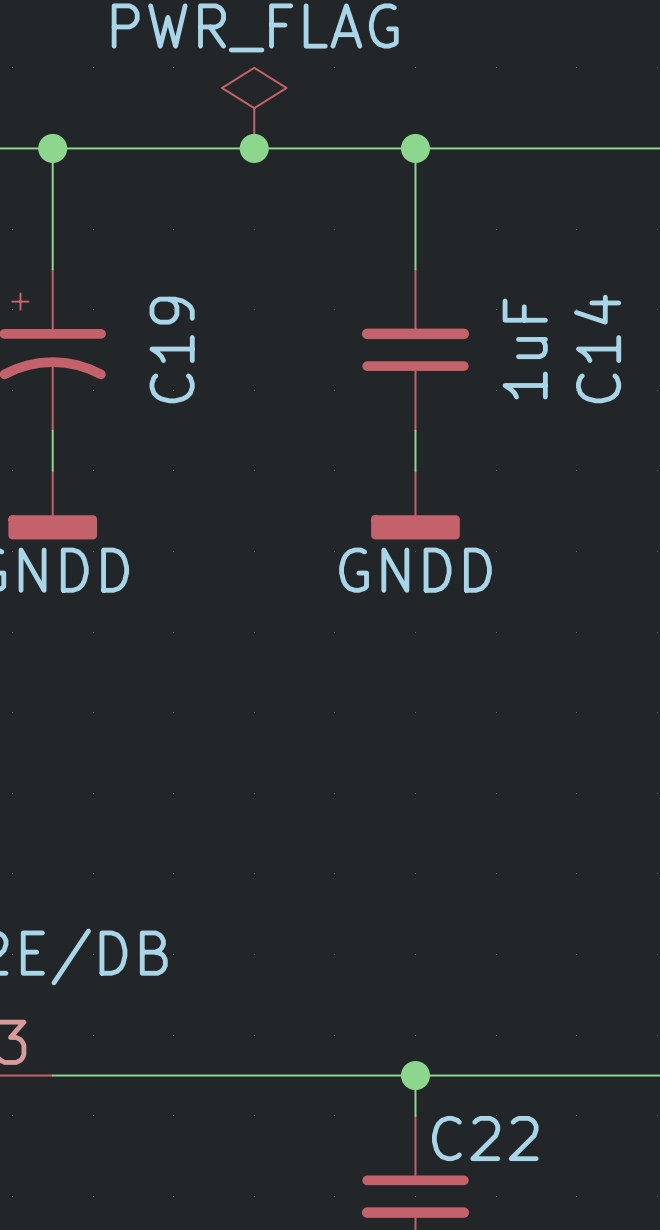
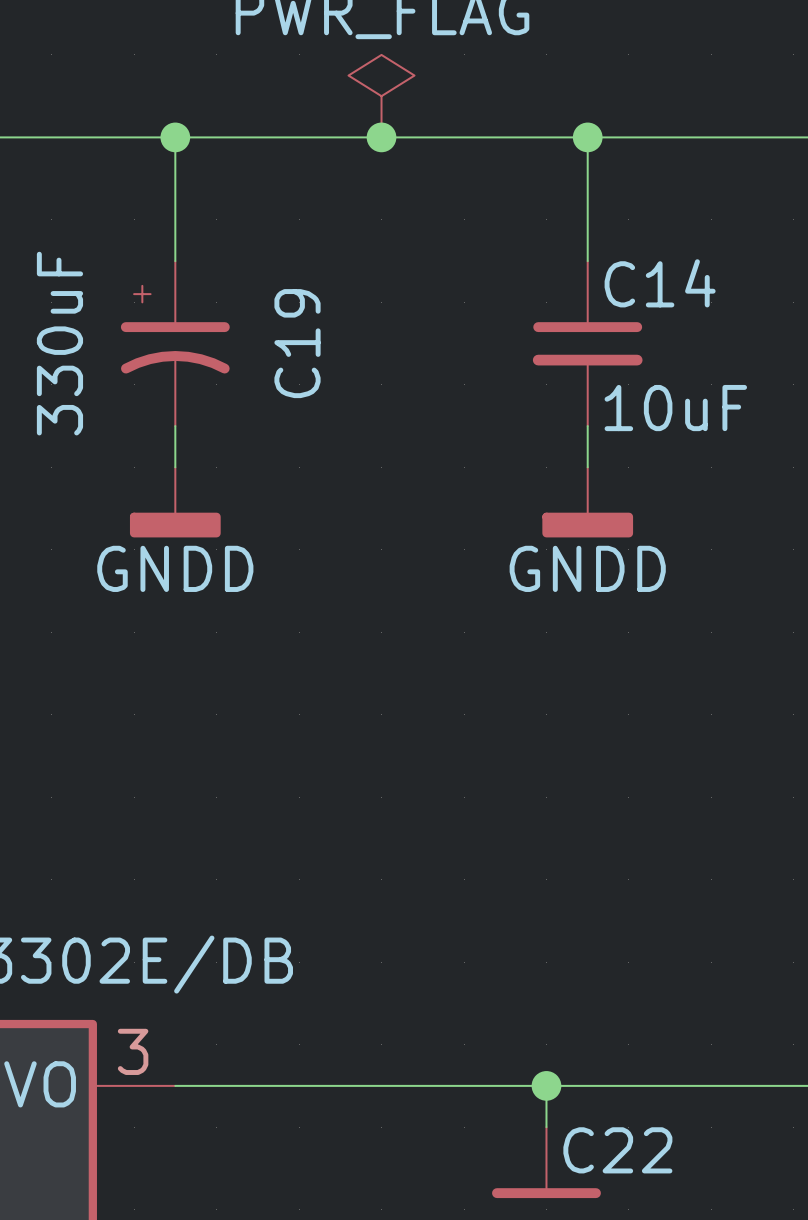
wire: (415, 148) (415, 269) -> (587, 137) (587, 261)
junction position: (415, 148) -> (587, 137)
C14 rotation: 0° (415, 349) -> 180° (587, 343)
C14 value: 1uF (525, 349) -> 10uF (675, 408)
C14 name position: C14 (597, 349) -> C14 (660, 283)
wire: (415, 430) (415, 470) -> (587, 426) (587, 467)
power symbol position: GNDD (415, 505) -> GNDD (587, 502)

